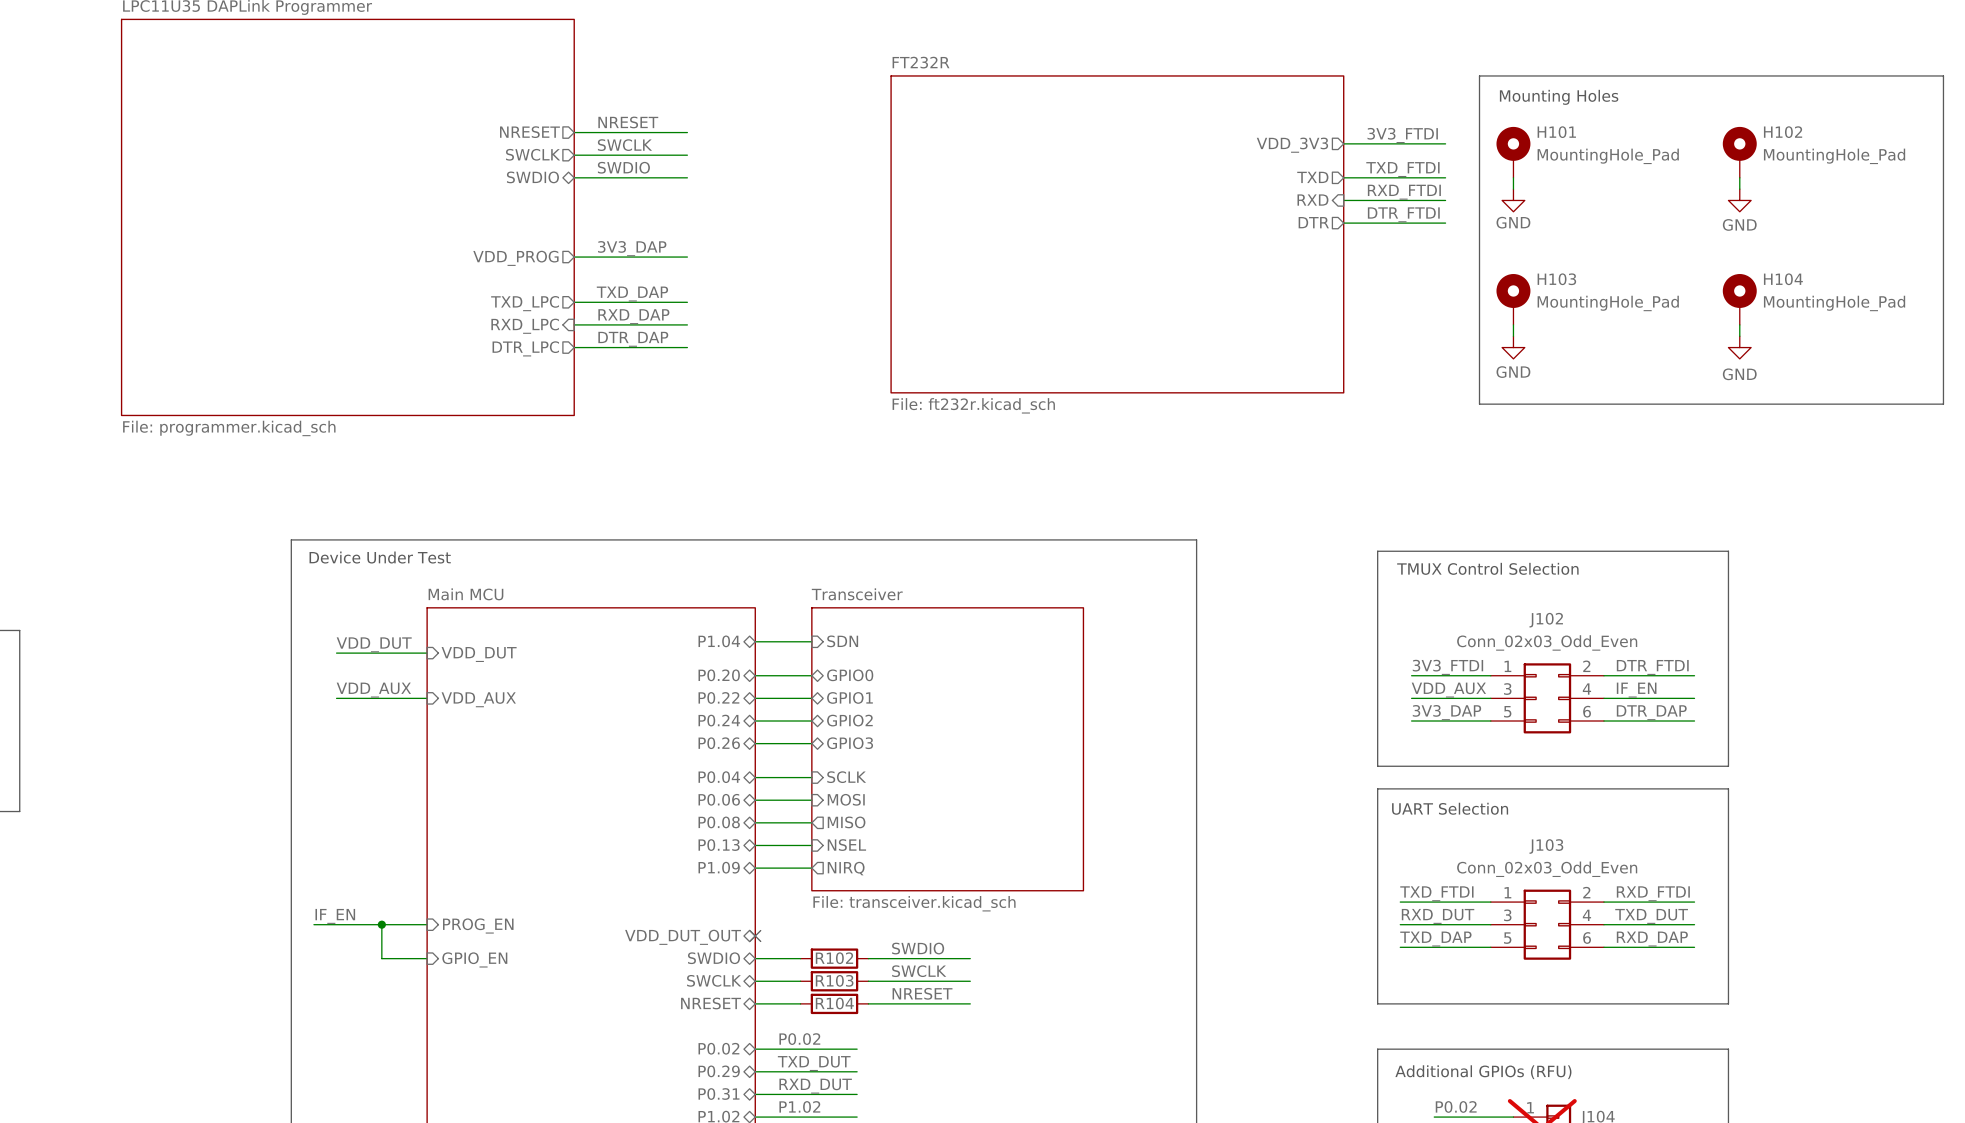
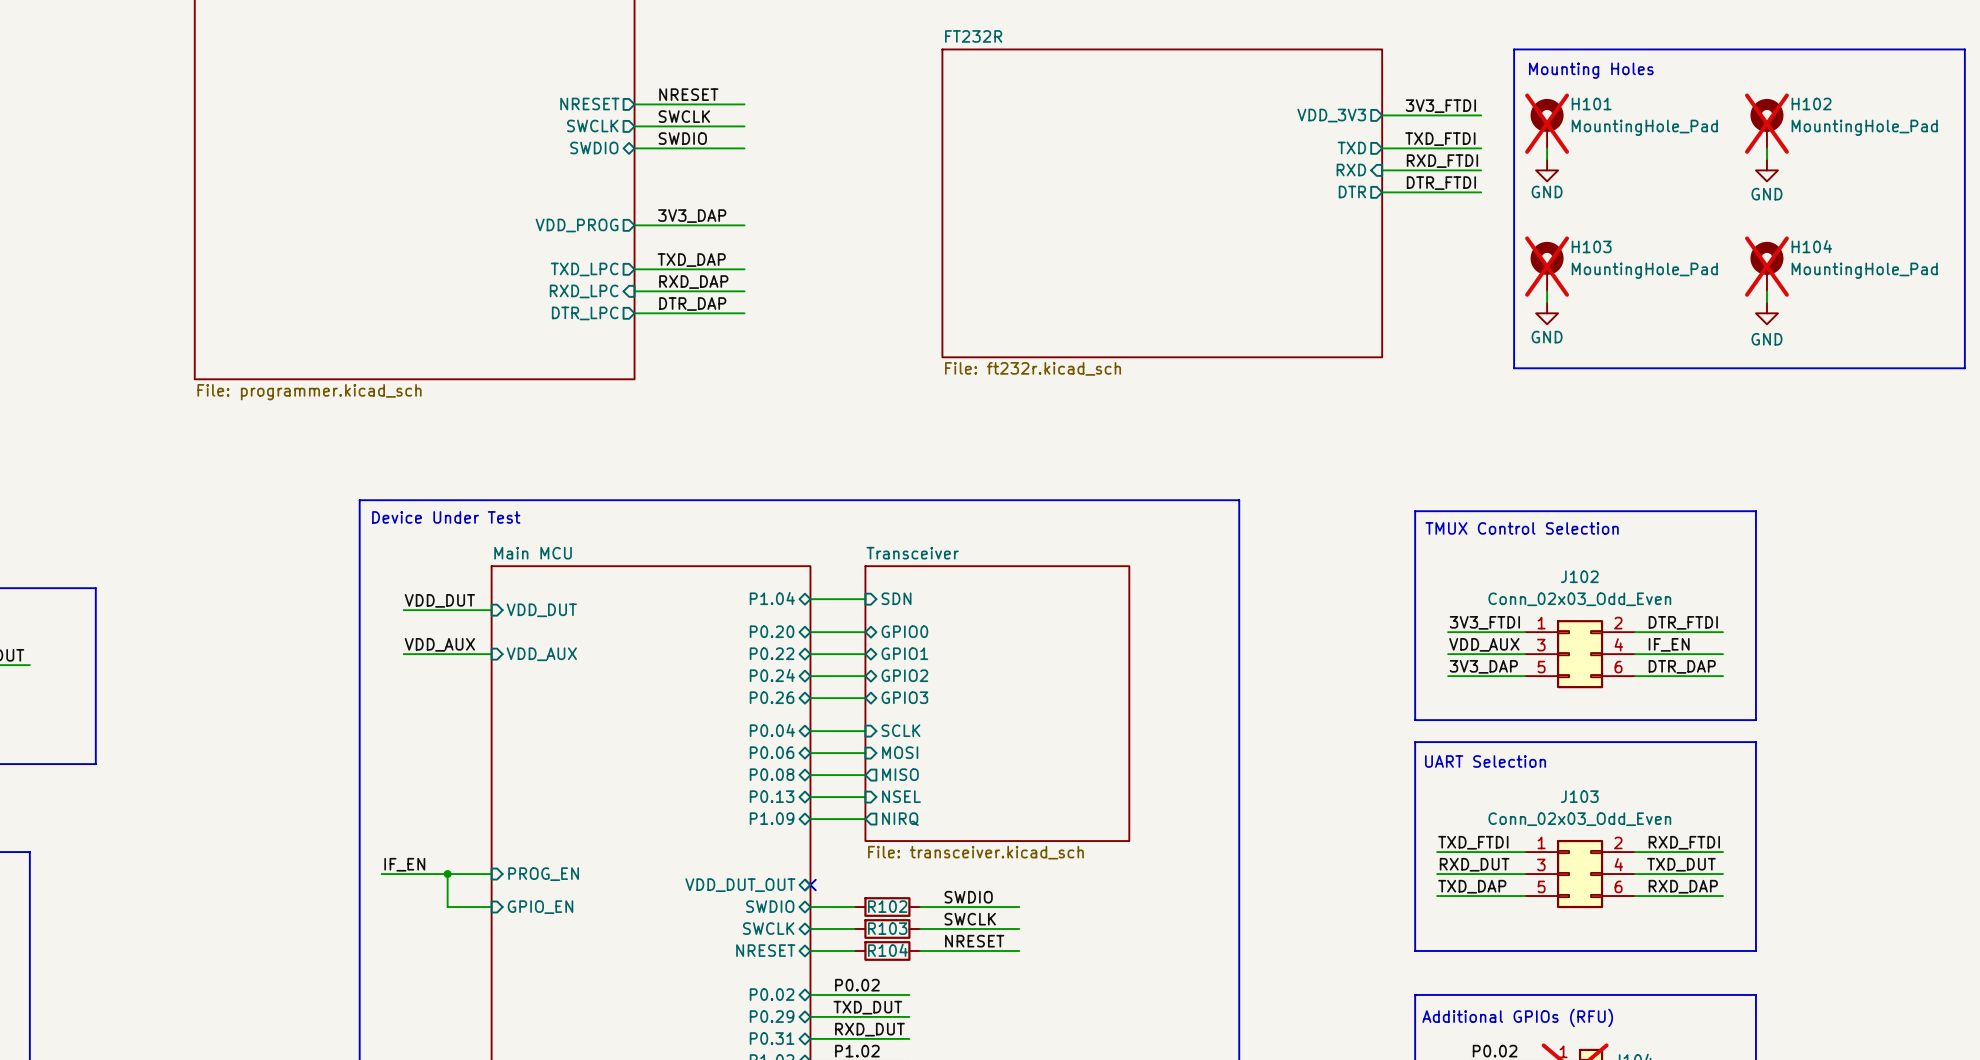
H101 do-not-place cross: none -> (1547, 123)
H102 do-not-place cross: none -> (1766, 123)
H103 do-not-place cross: none -> (1547, 266)
H104 do-not-place cross: none -> (1766, 266)

